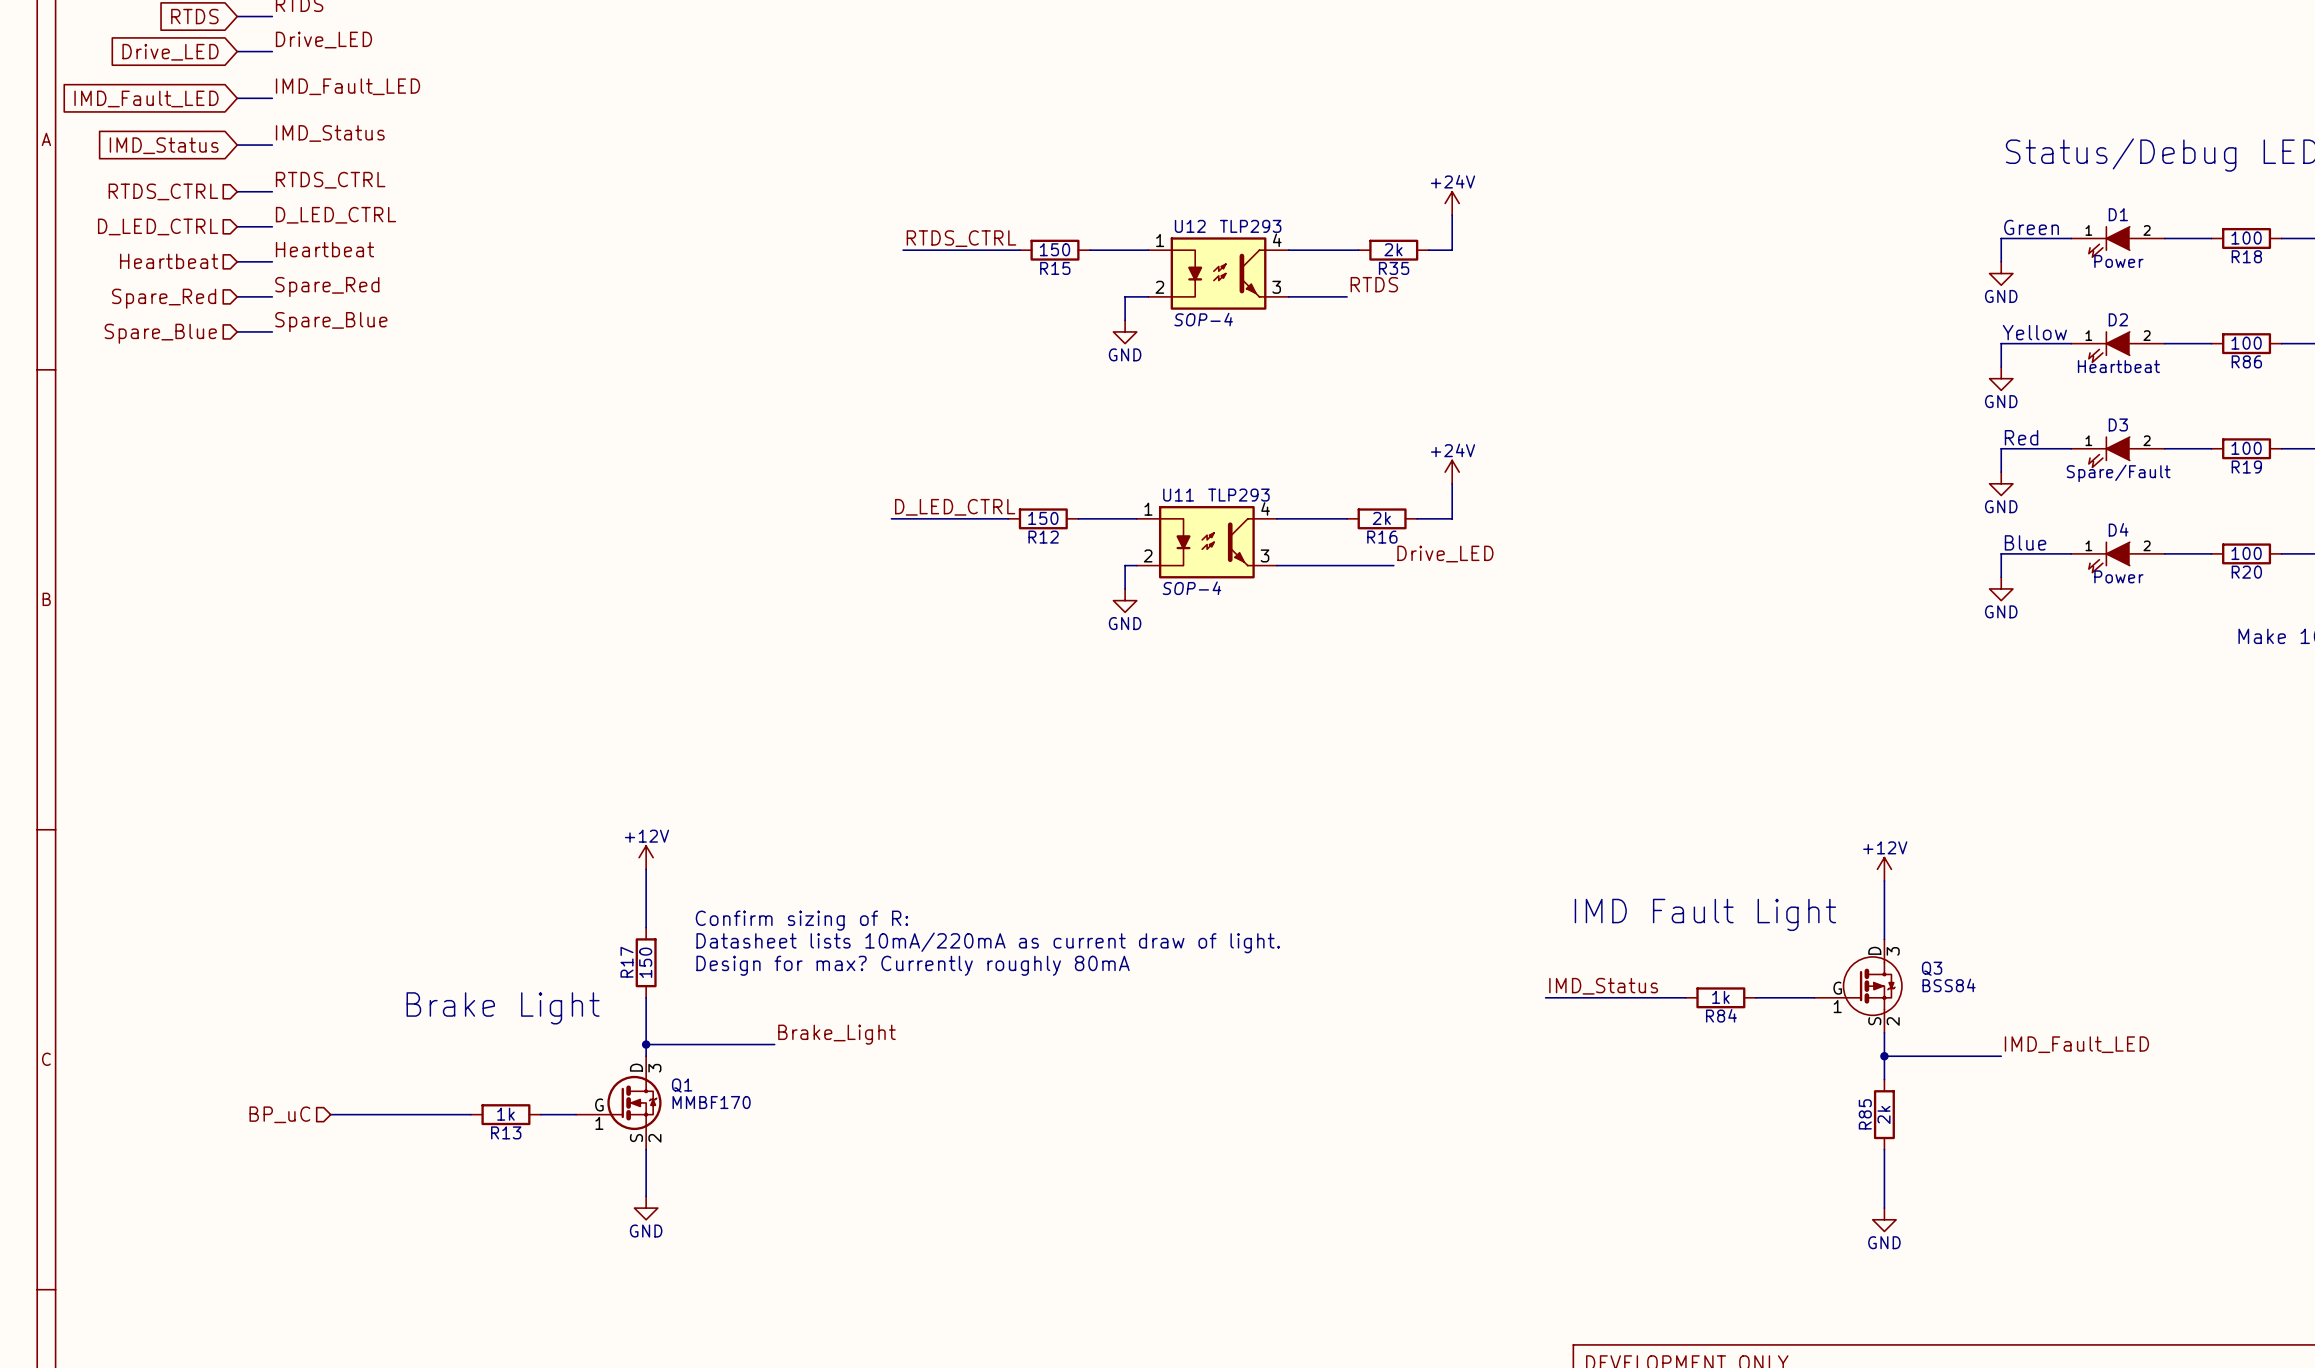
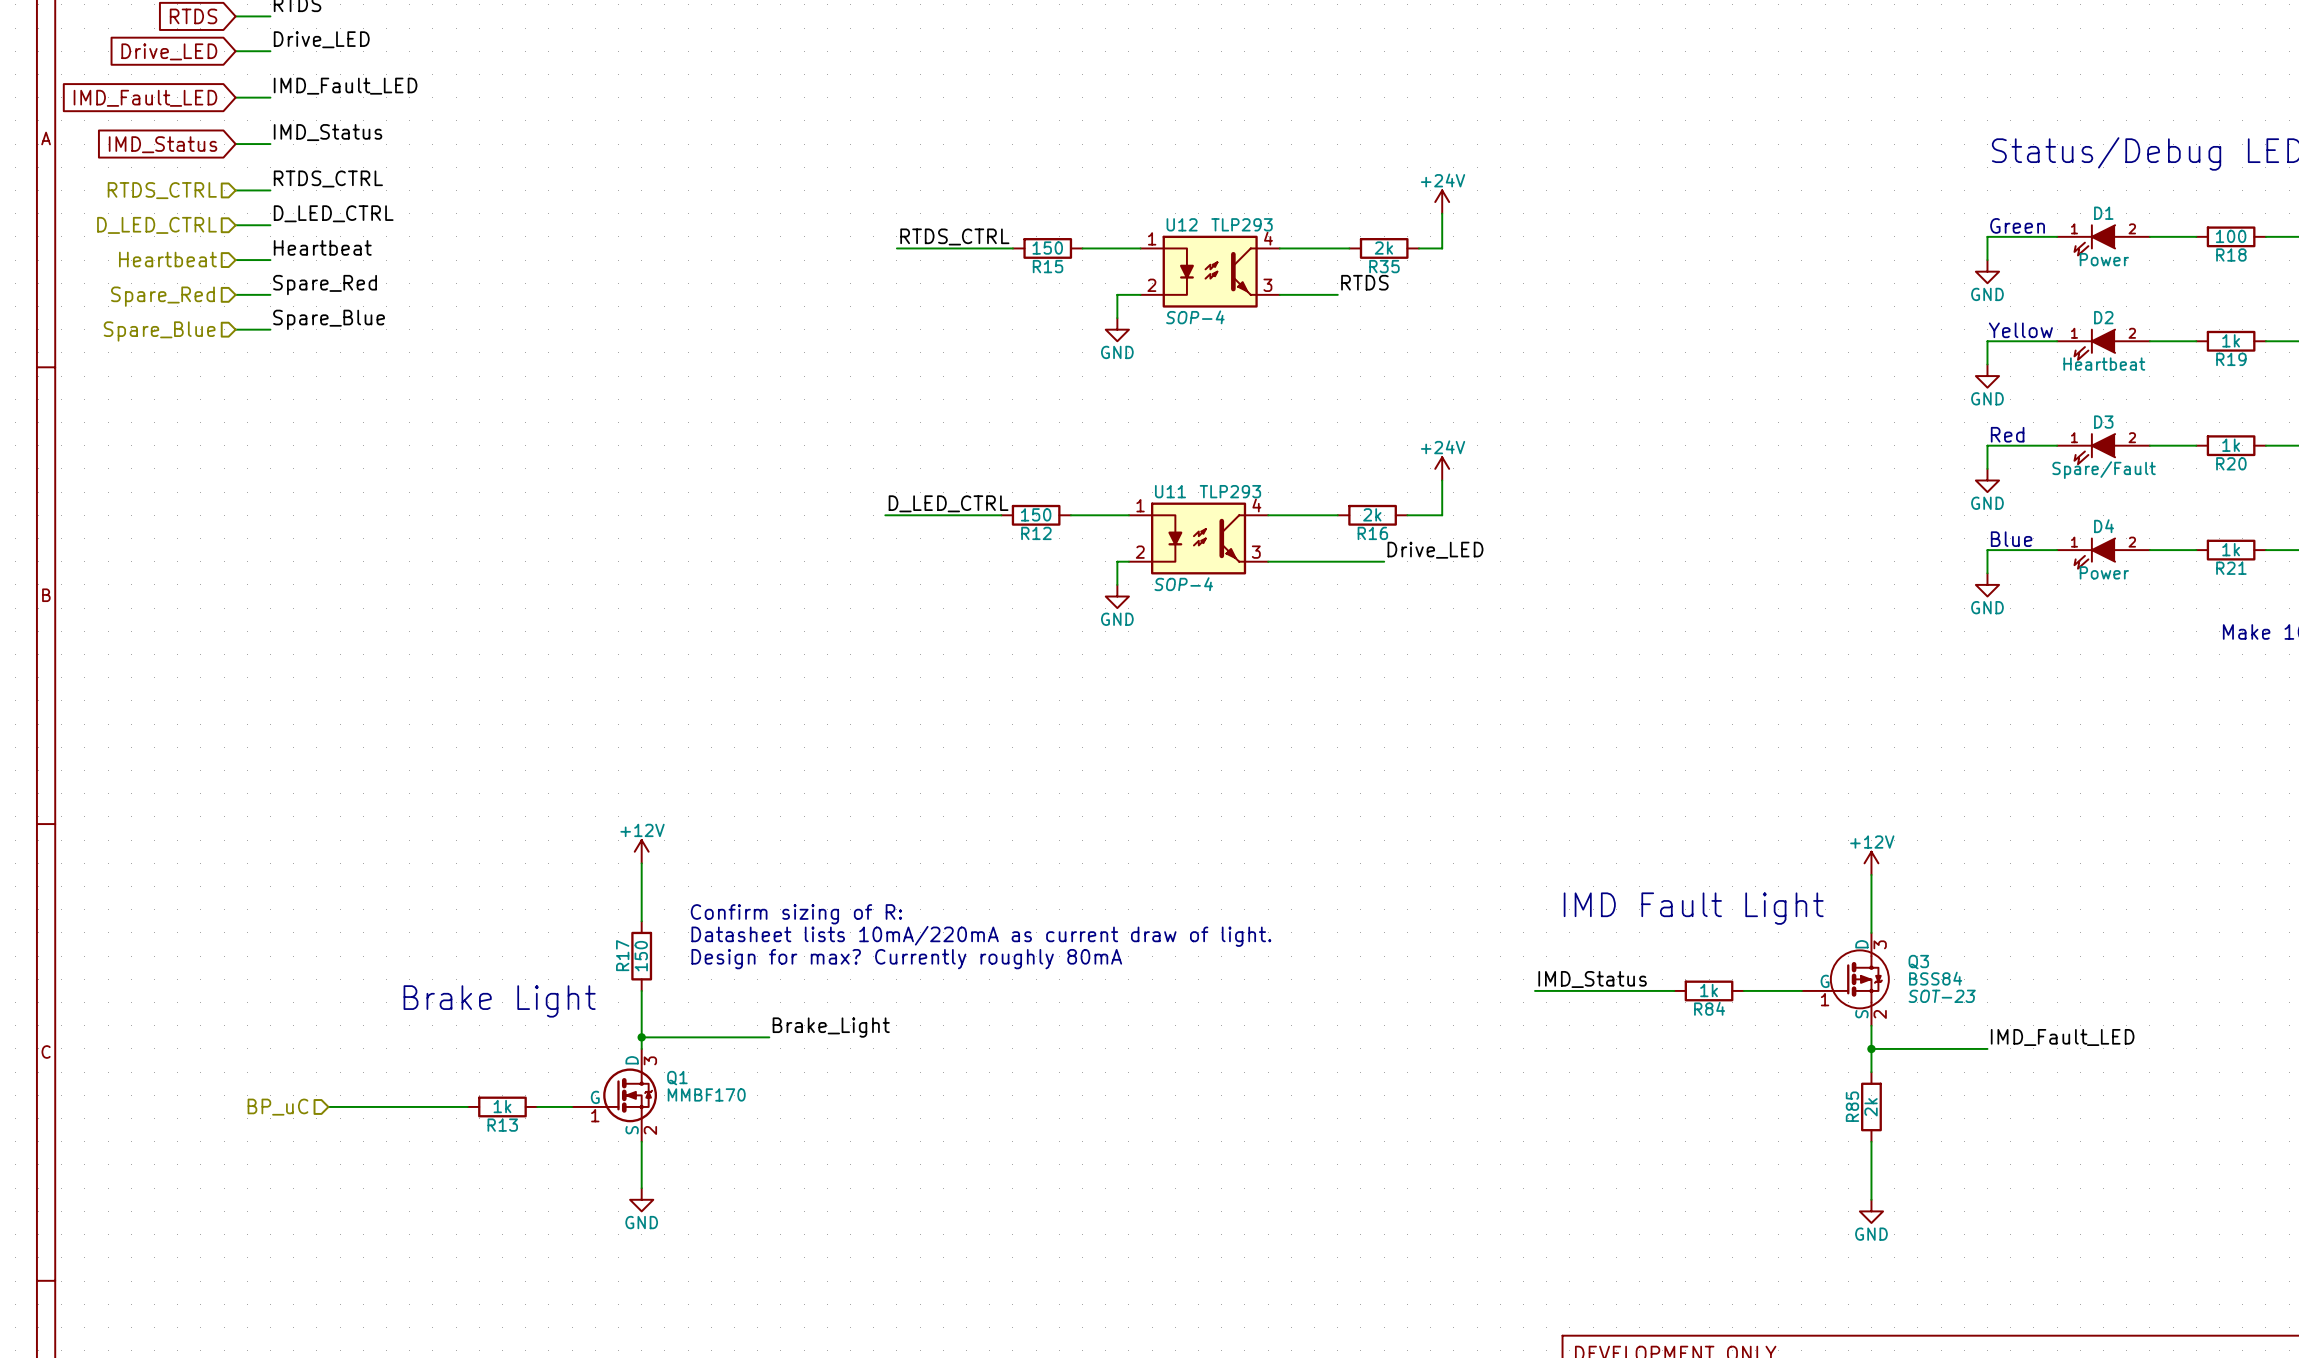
R86 value: 100 (2246, 343) -> 1k (2231, 340)
R86 name: R86 (2246, 361) -> R19 (2231, 359)
R19 value: 100 (2246, 448) -> 1k (2231, 445)
R19 name: R19 (2246, 467) -> R20 (2231, 463)
R20 value: 100 (2246, 553) -> 1k (2231, 549)
R20 name: R20 (2246, 572) -> R21 (2231, 568)
Q3 text: none -> SOT-23 (1942, 996)

